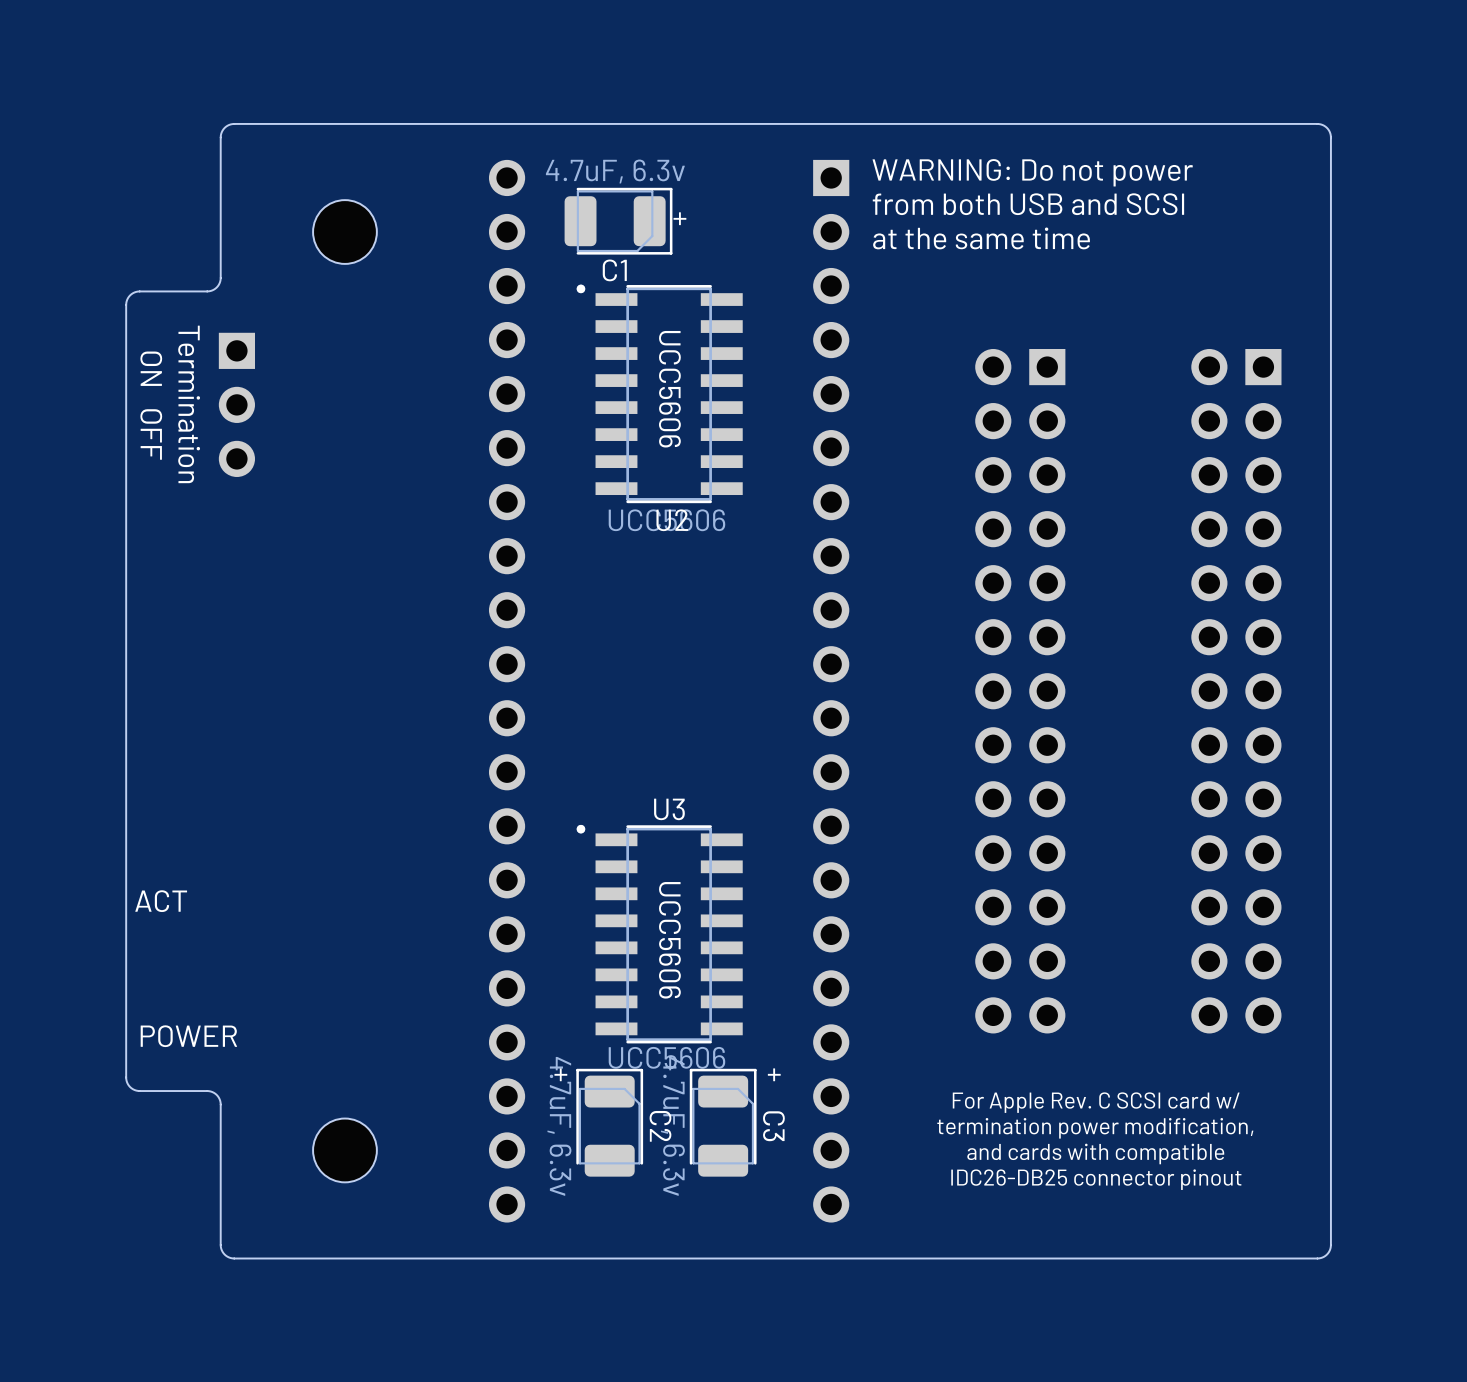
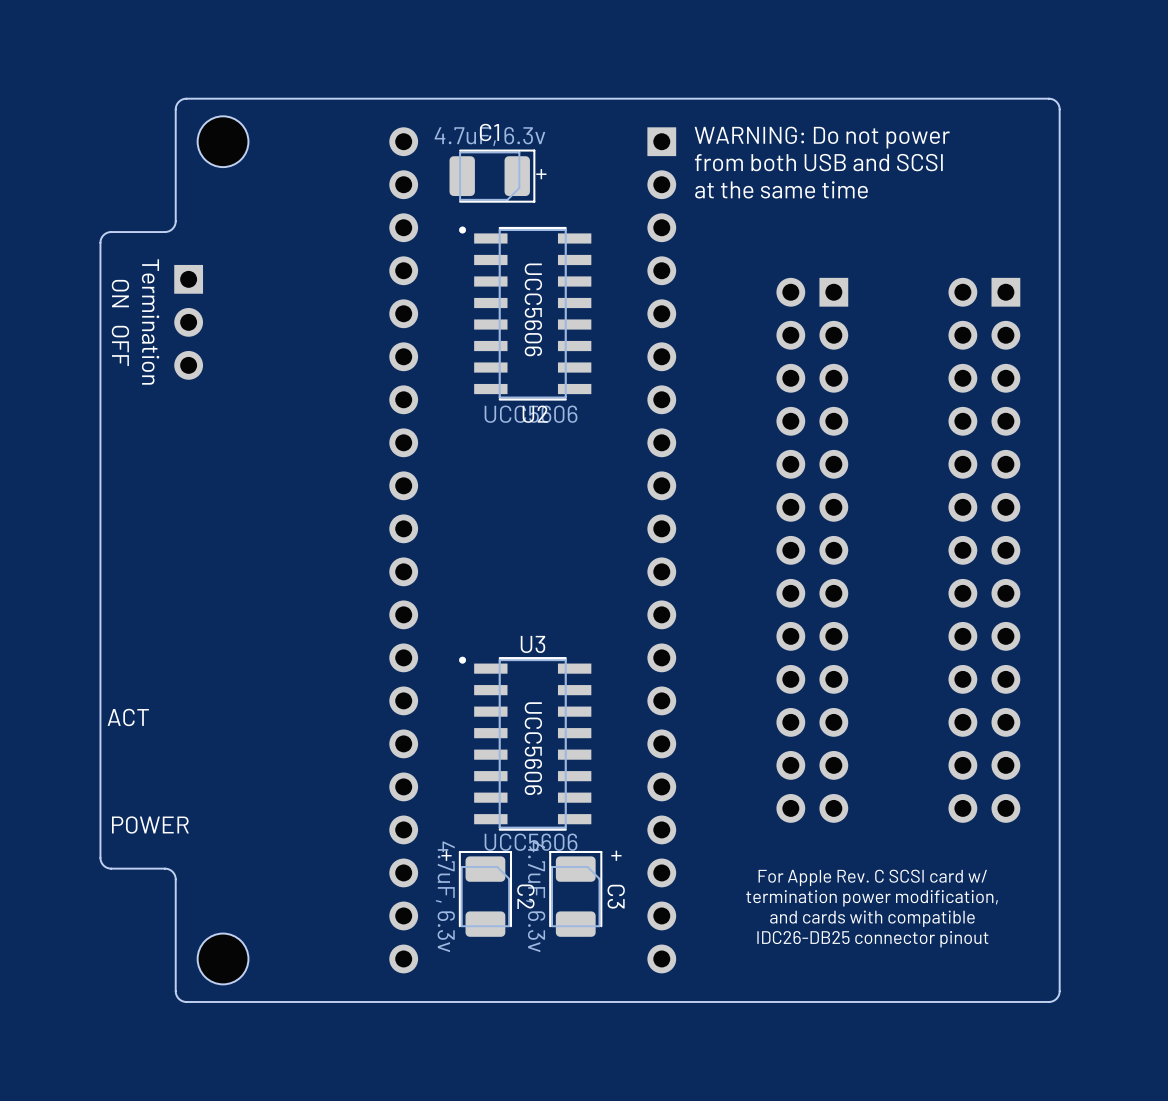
part position: (344, 232) -> (223, 141)
C1 name position: C1 (614, 270) -> C1 (489, 132)
part position: (344, 1150) -> (223, 958)

